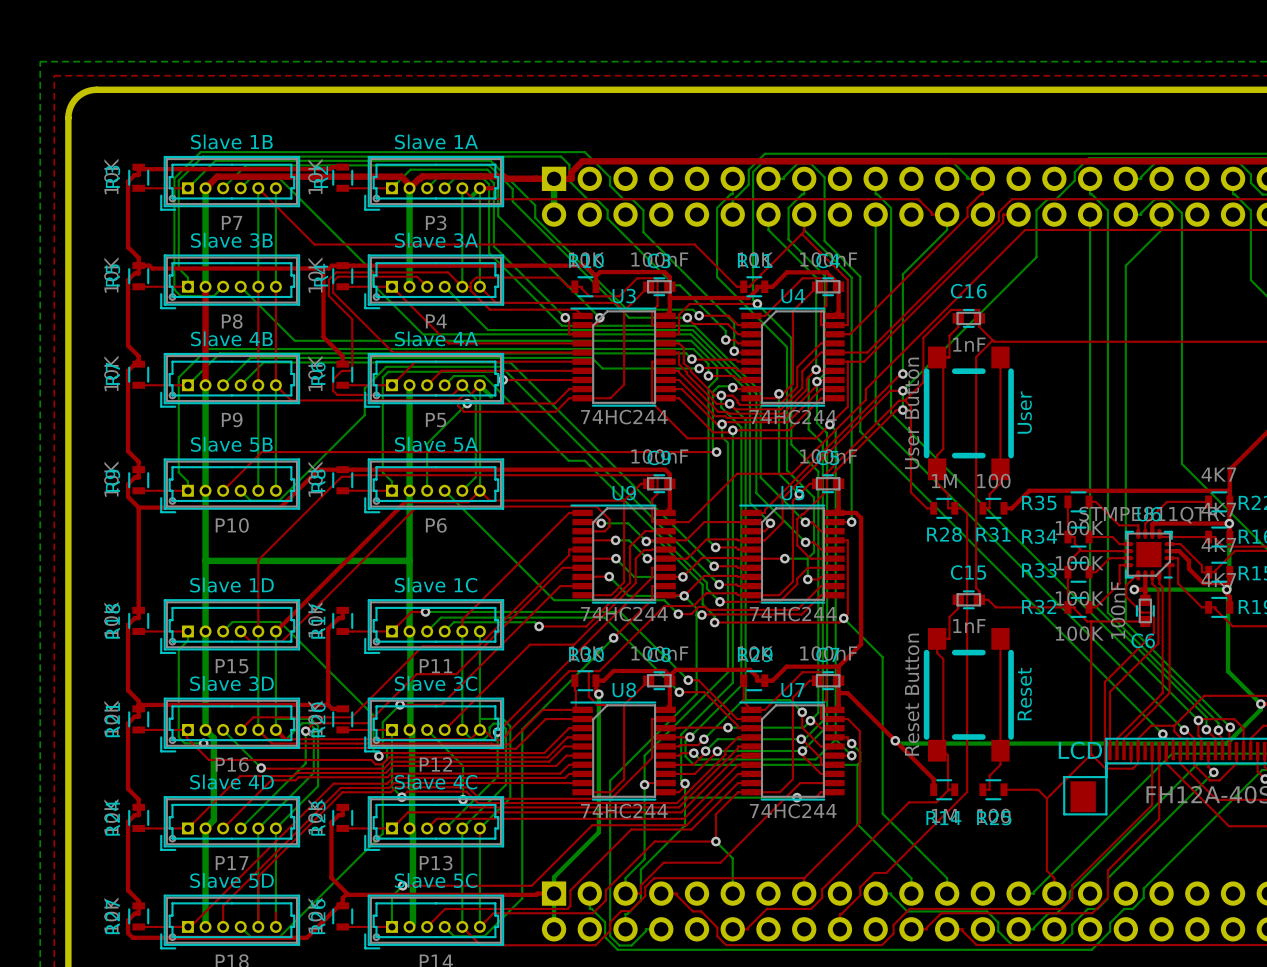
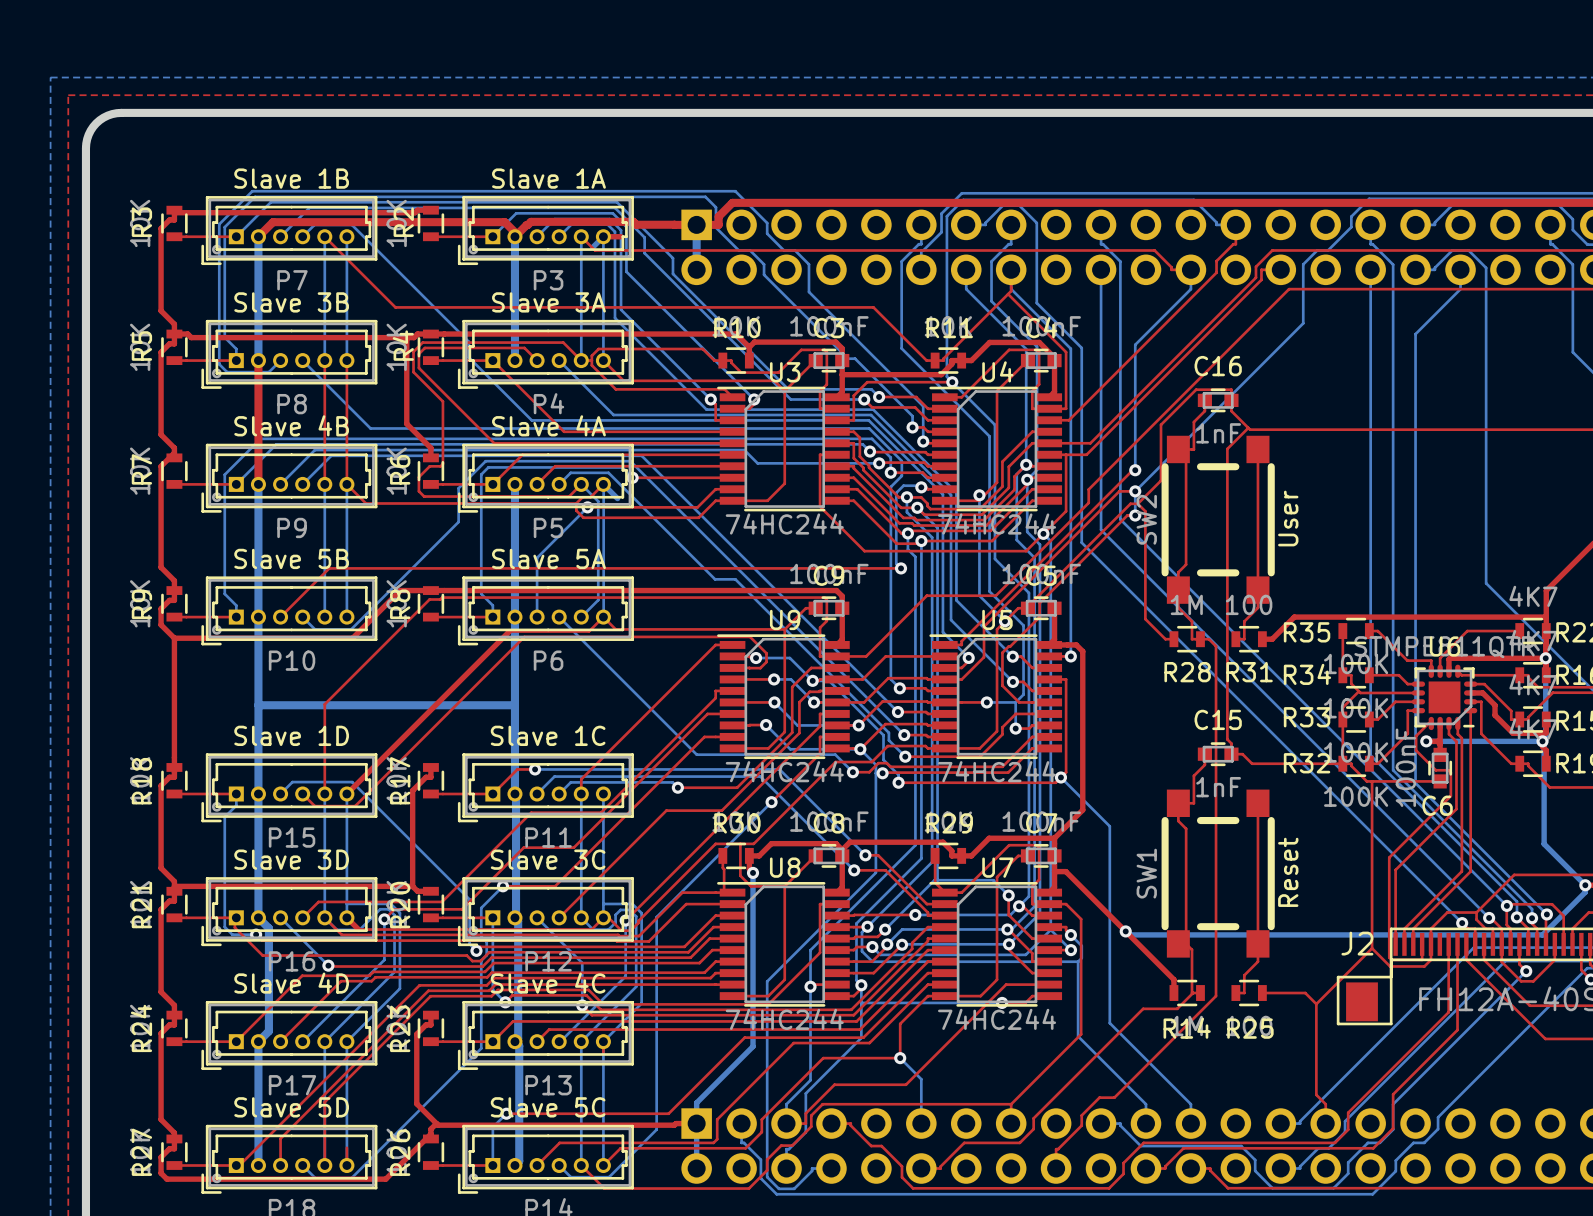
User name: User (1024, 412) -> SW2 (1146, 519)
User value: User Button (912, 413) -> User (1288, 518)
Reset value: Reset Button (912, 694) -> Reset (1288, 872)
Reset name: Reset (1024, 694) -> SW1 (1146, 873)
LCD name: LCD (1080, 750) -> J2 (1357, 943)

